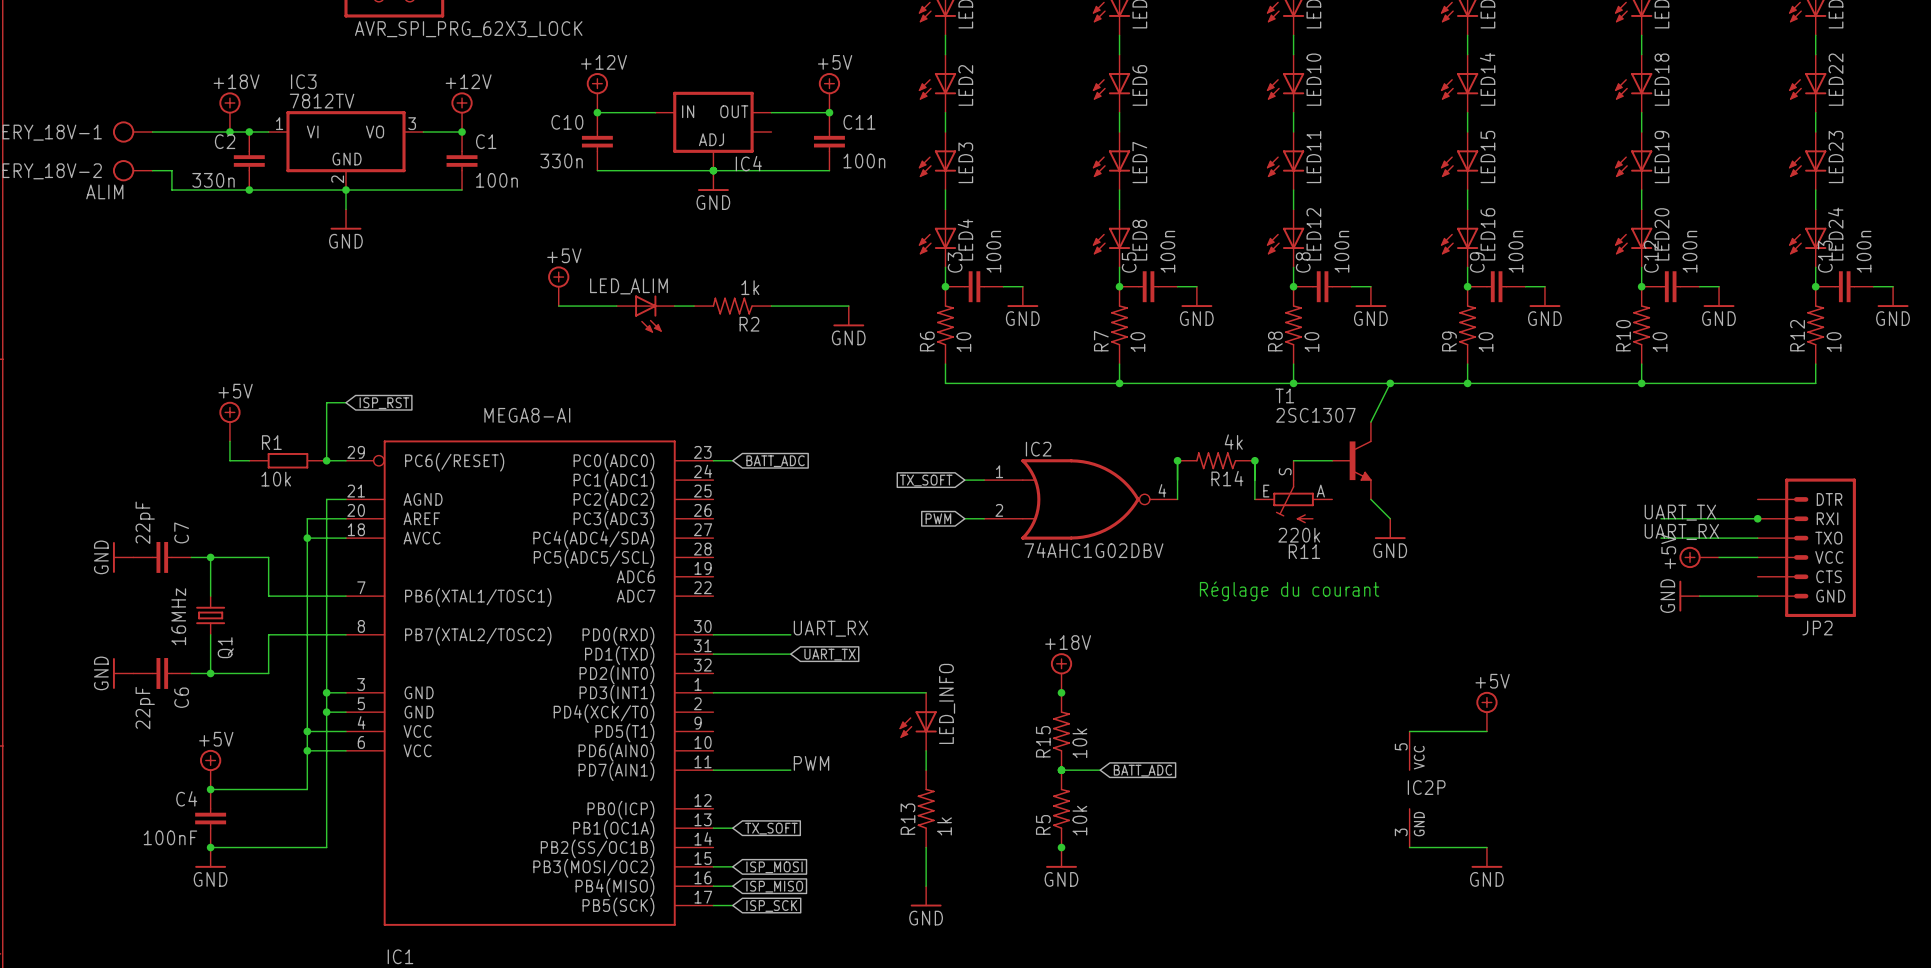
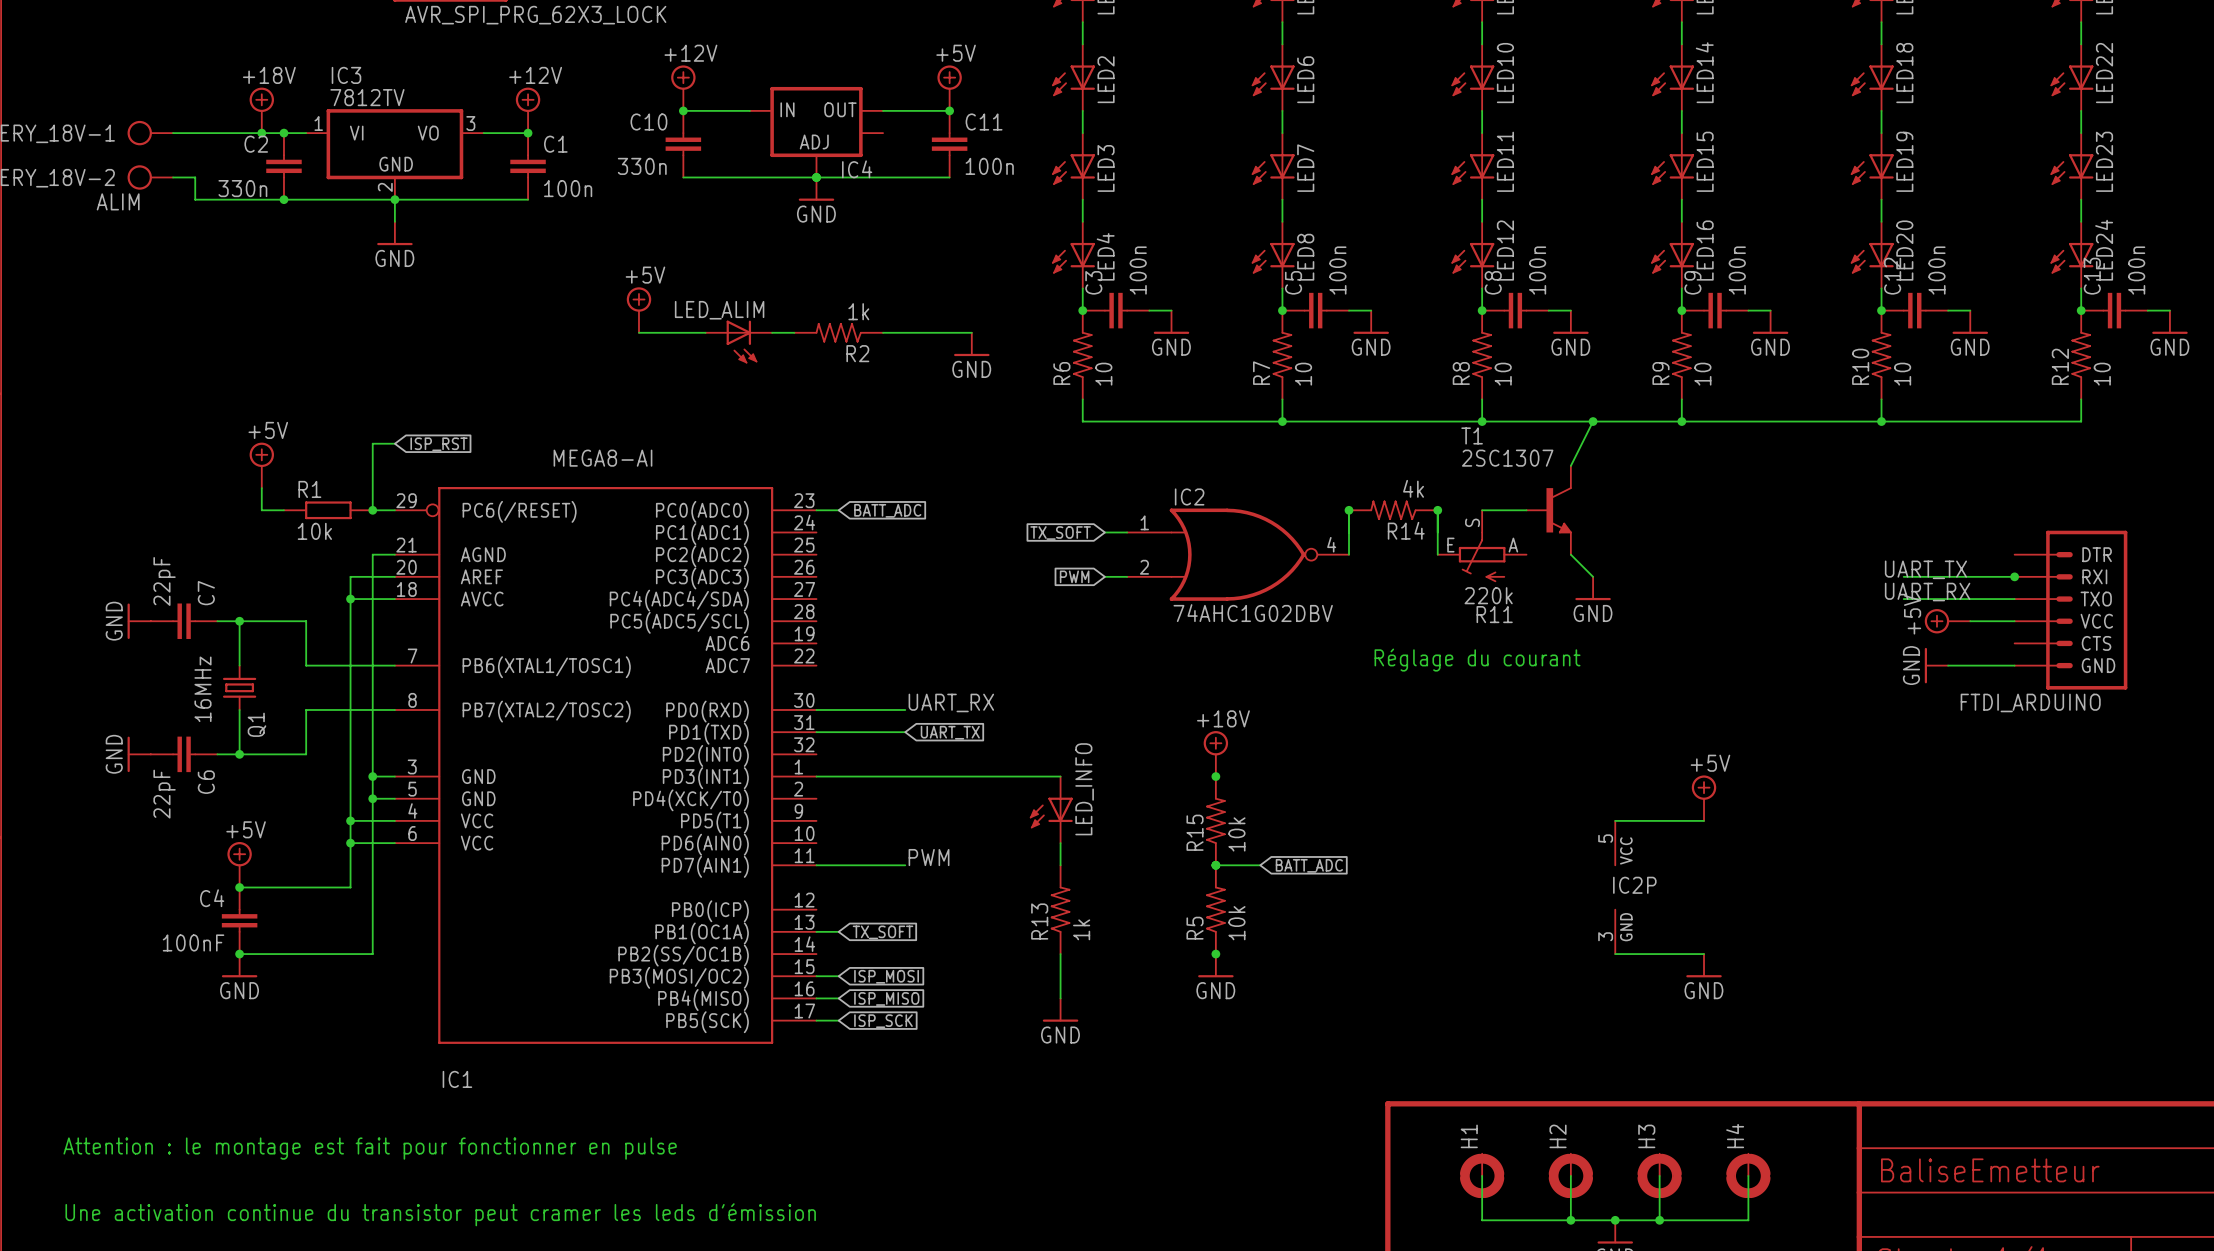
JP2 name: JP2 (1817, 628) -> FTDI_ARDUINO (2030, 702)

